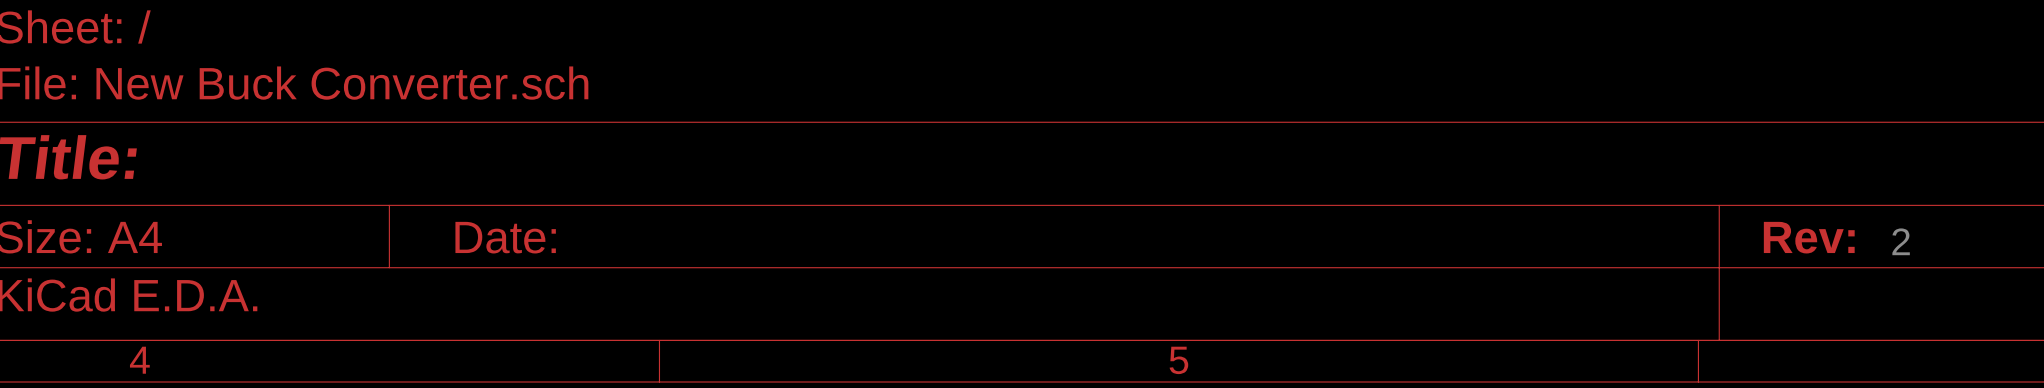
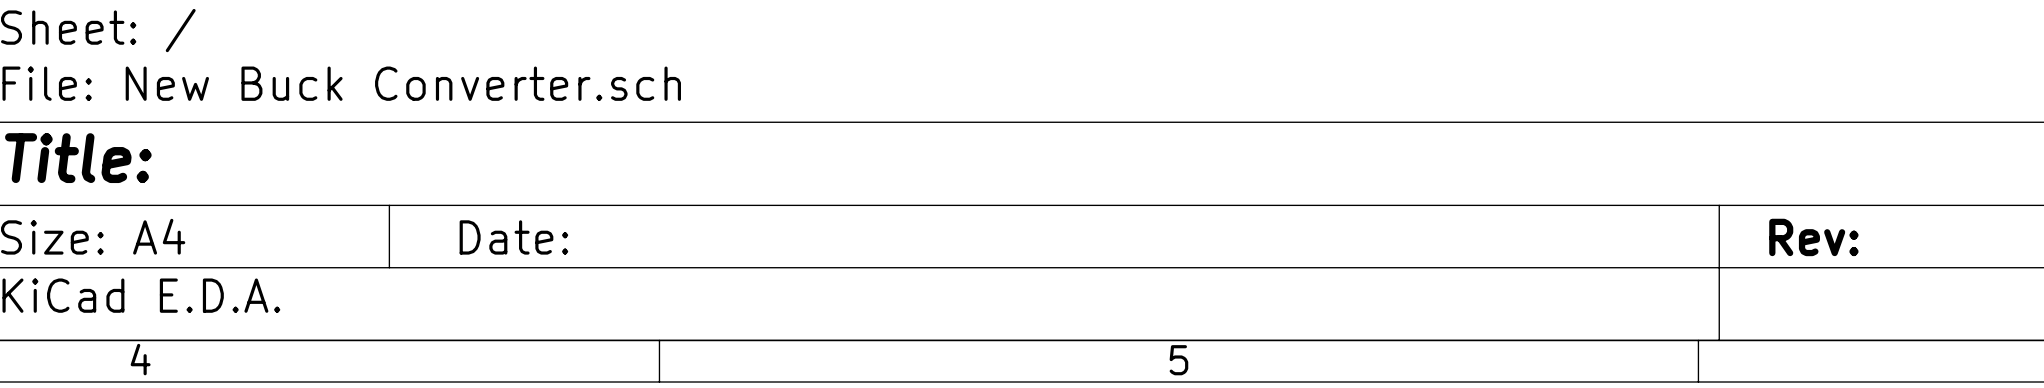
text: 2 (1901, 241) -> none

